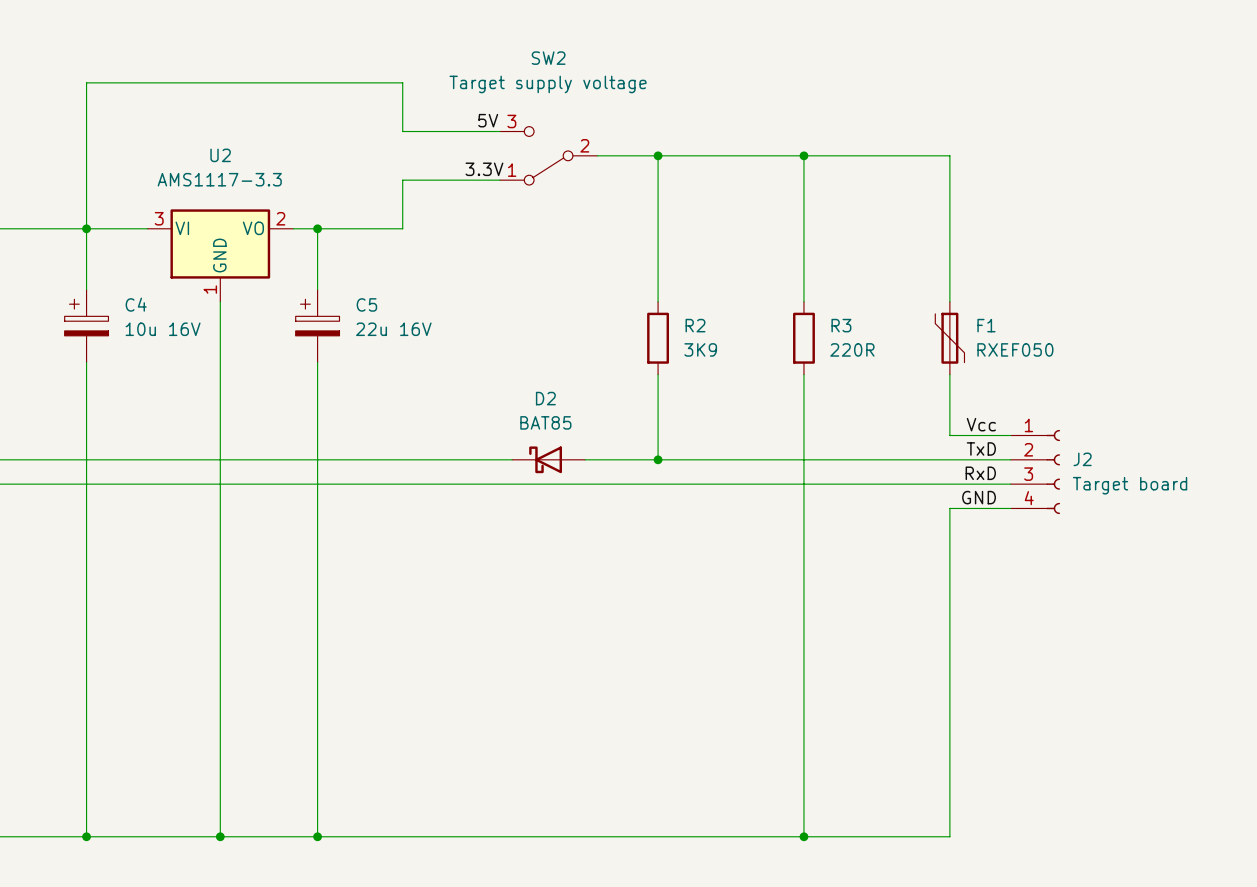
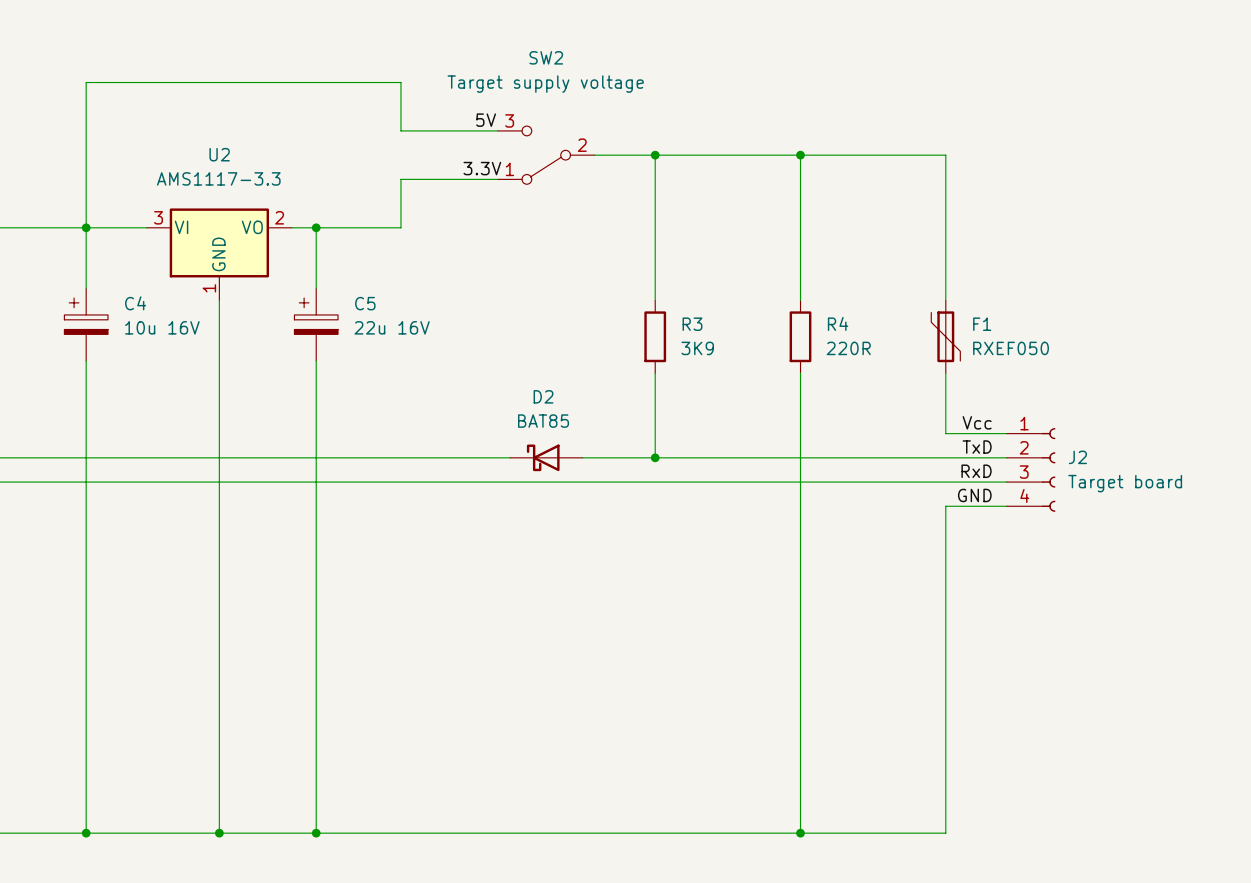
R2 name: R2 (695, 325) -> R3 (692, 324)
R3 name: R3 (841, 325) -> R4 (838, 323)

